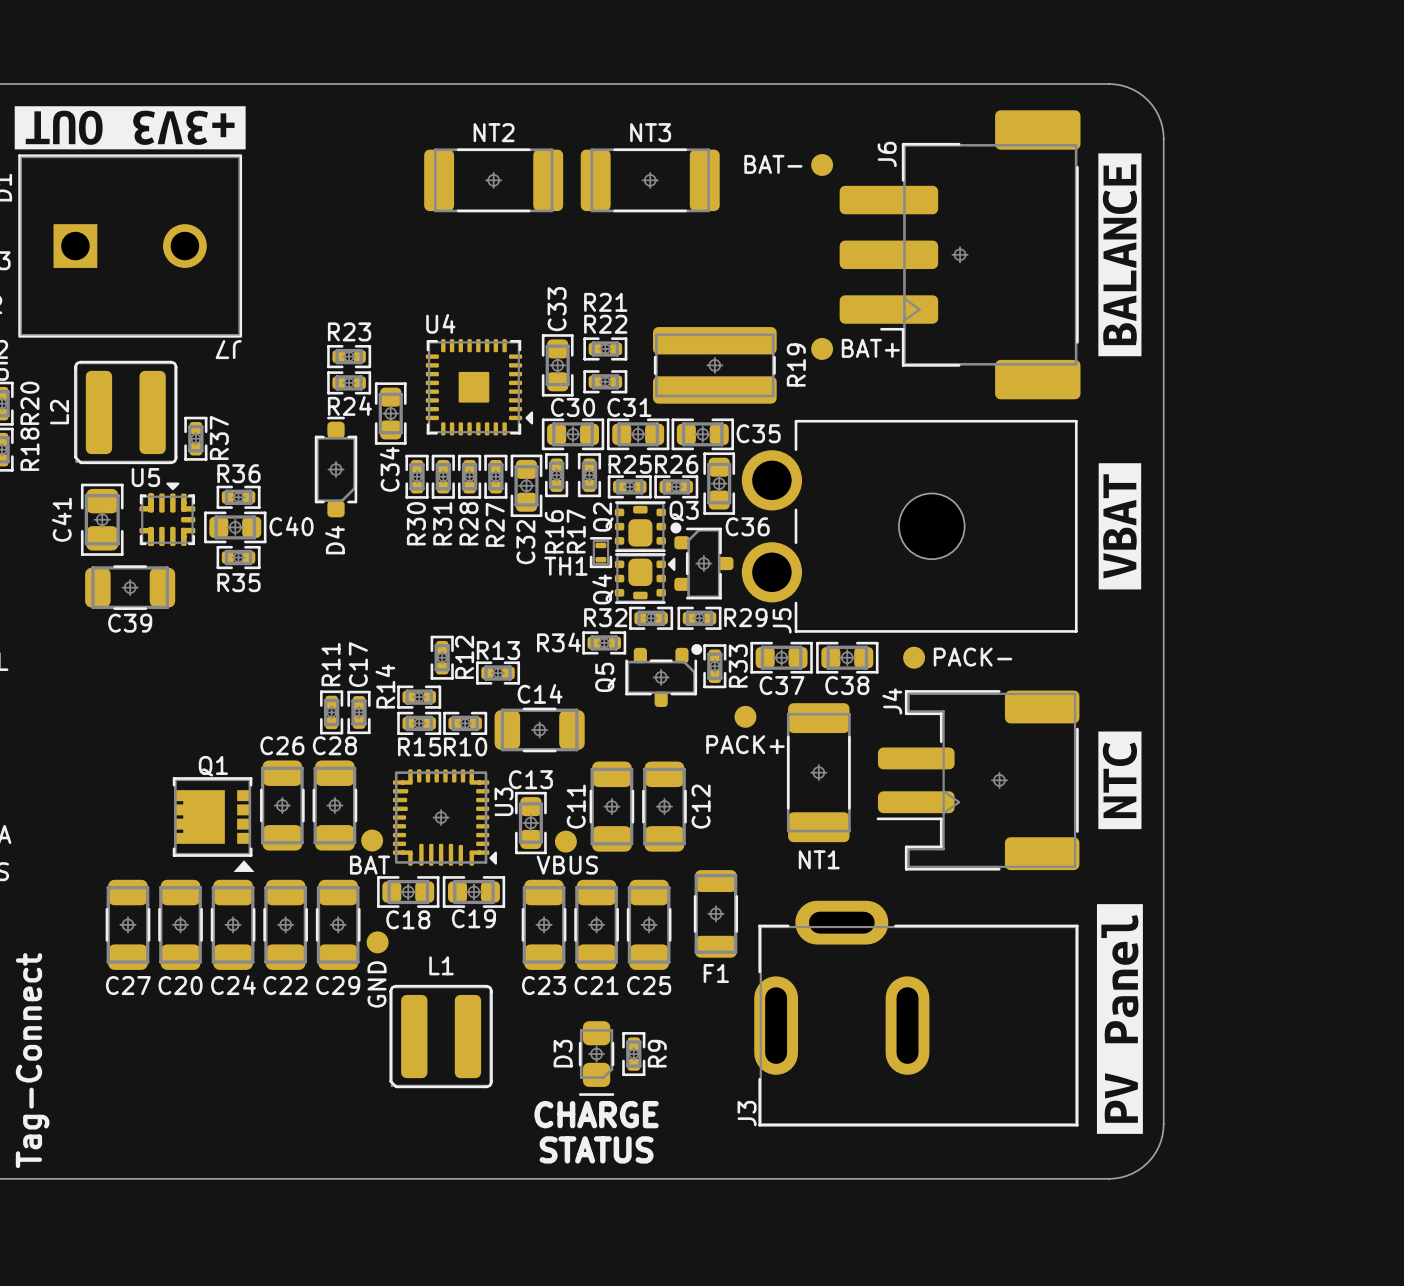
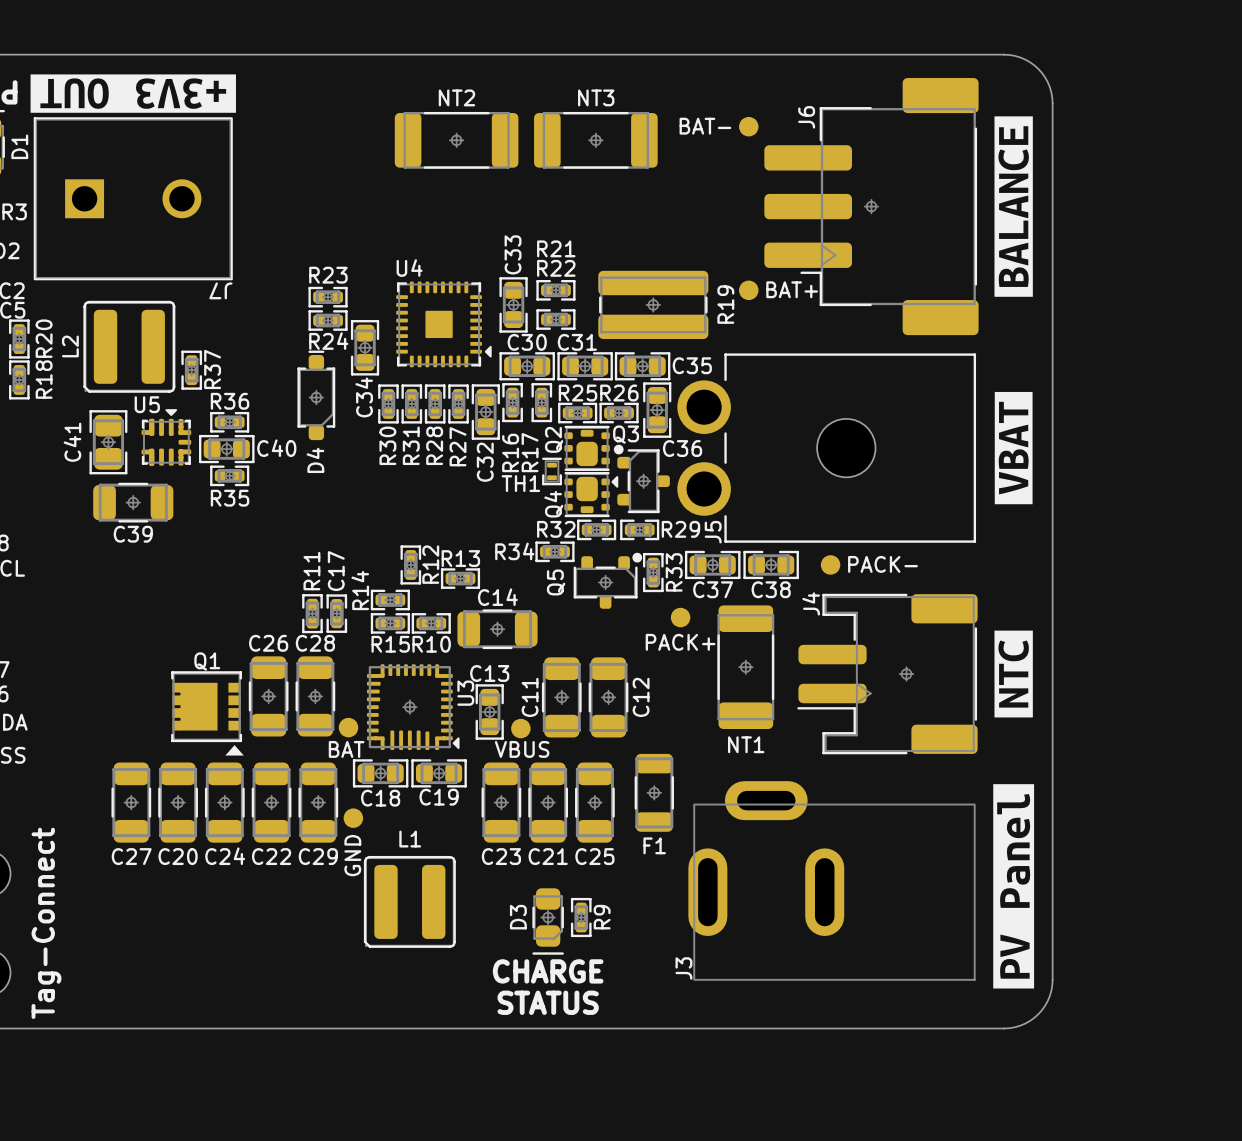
J3 footprint: [754, 900, 1079, 1127] -> [688, 781, 976, 981]

